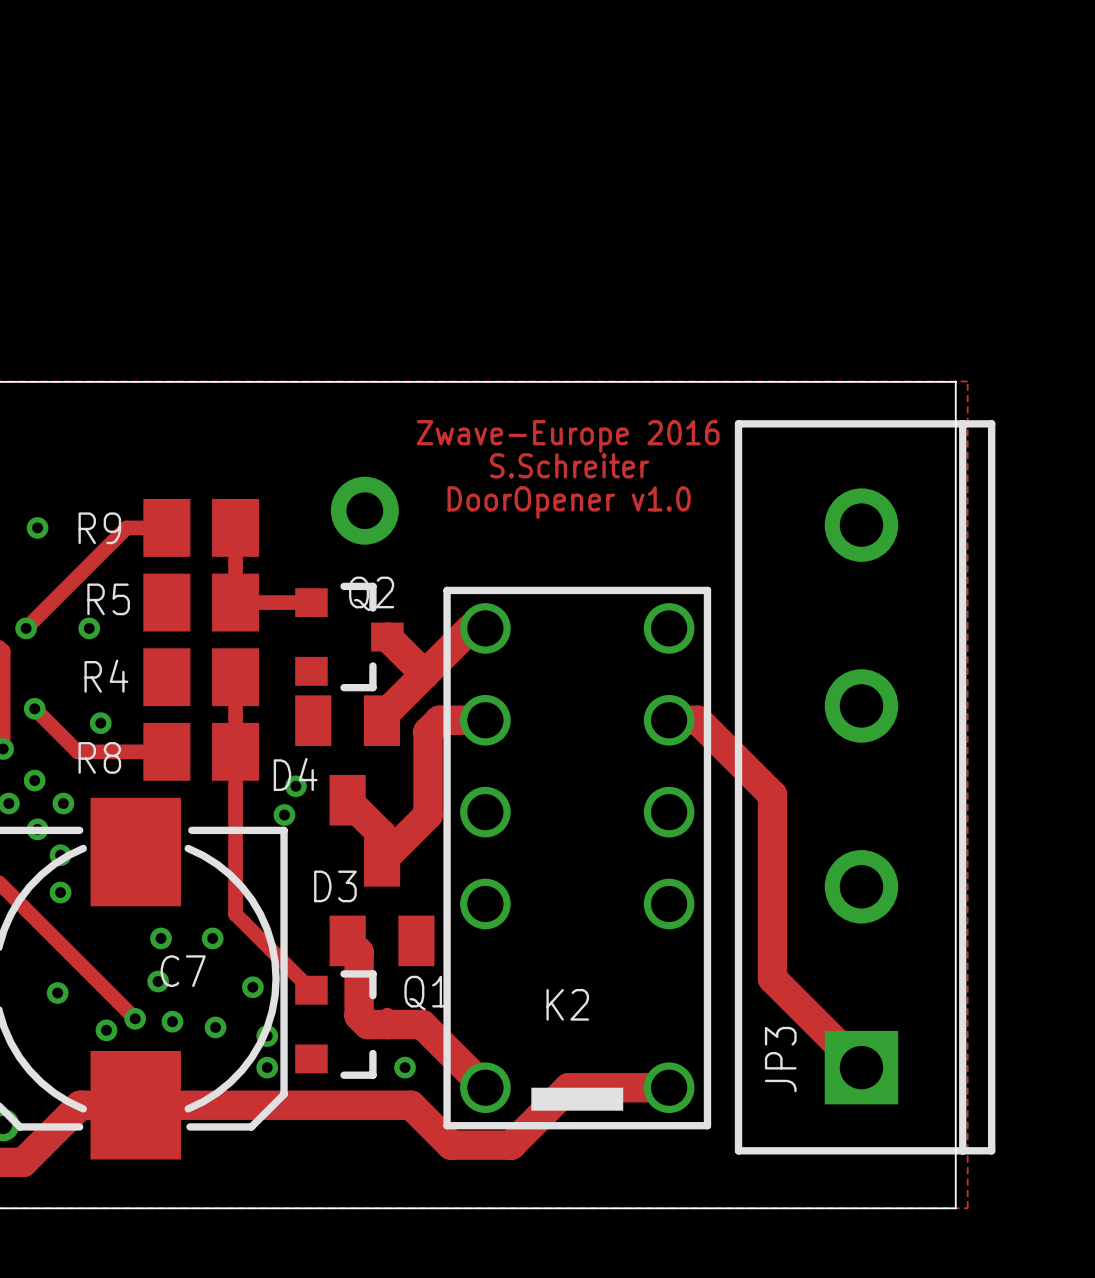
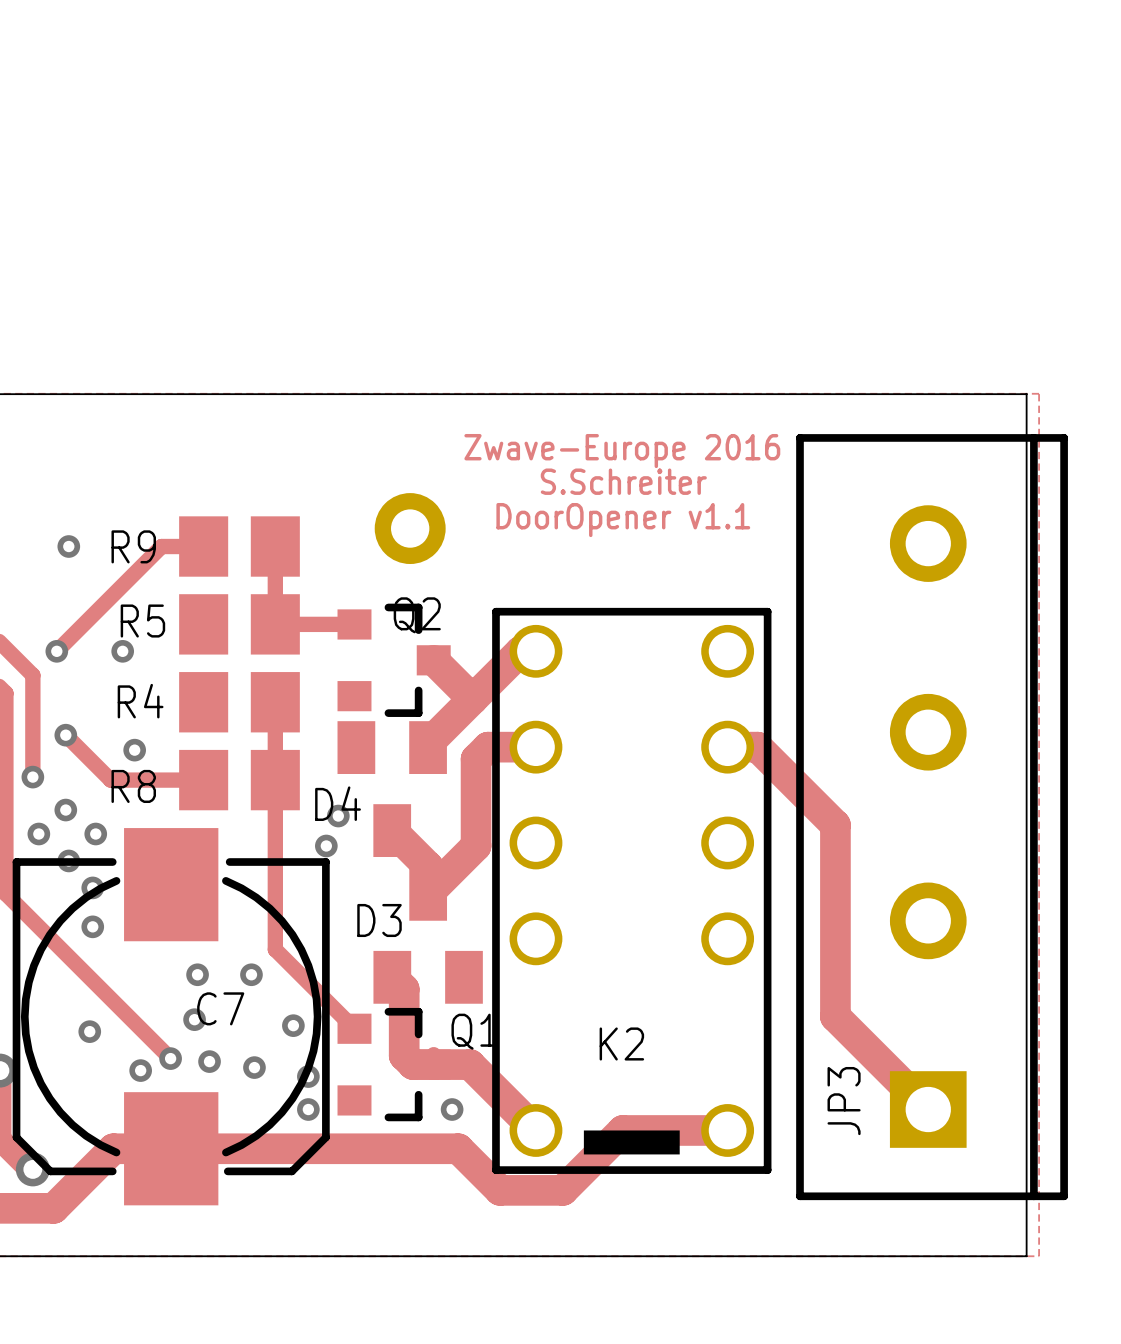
text: DoorOpener v1.0 (569, 502) -> DoorOpener v1.1 (623, 520)

